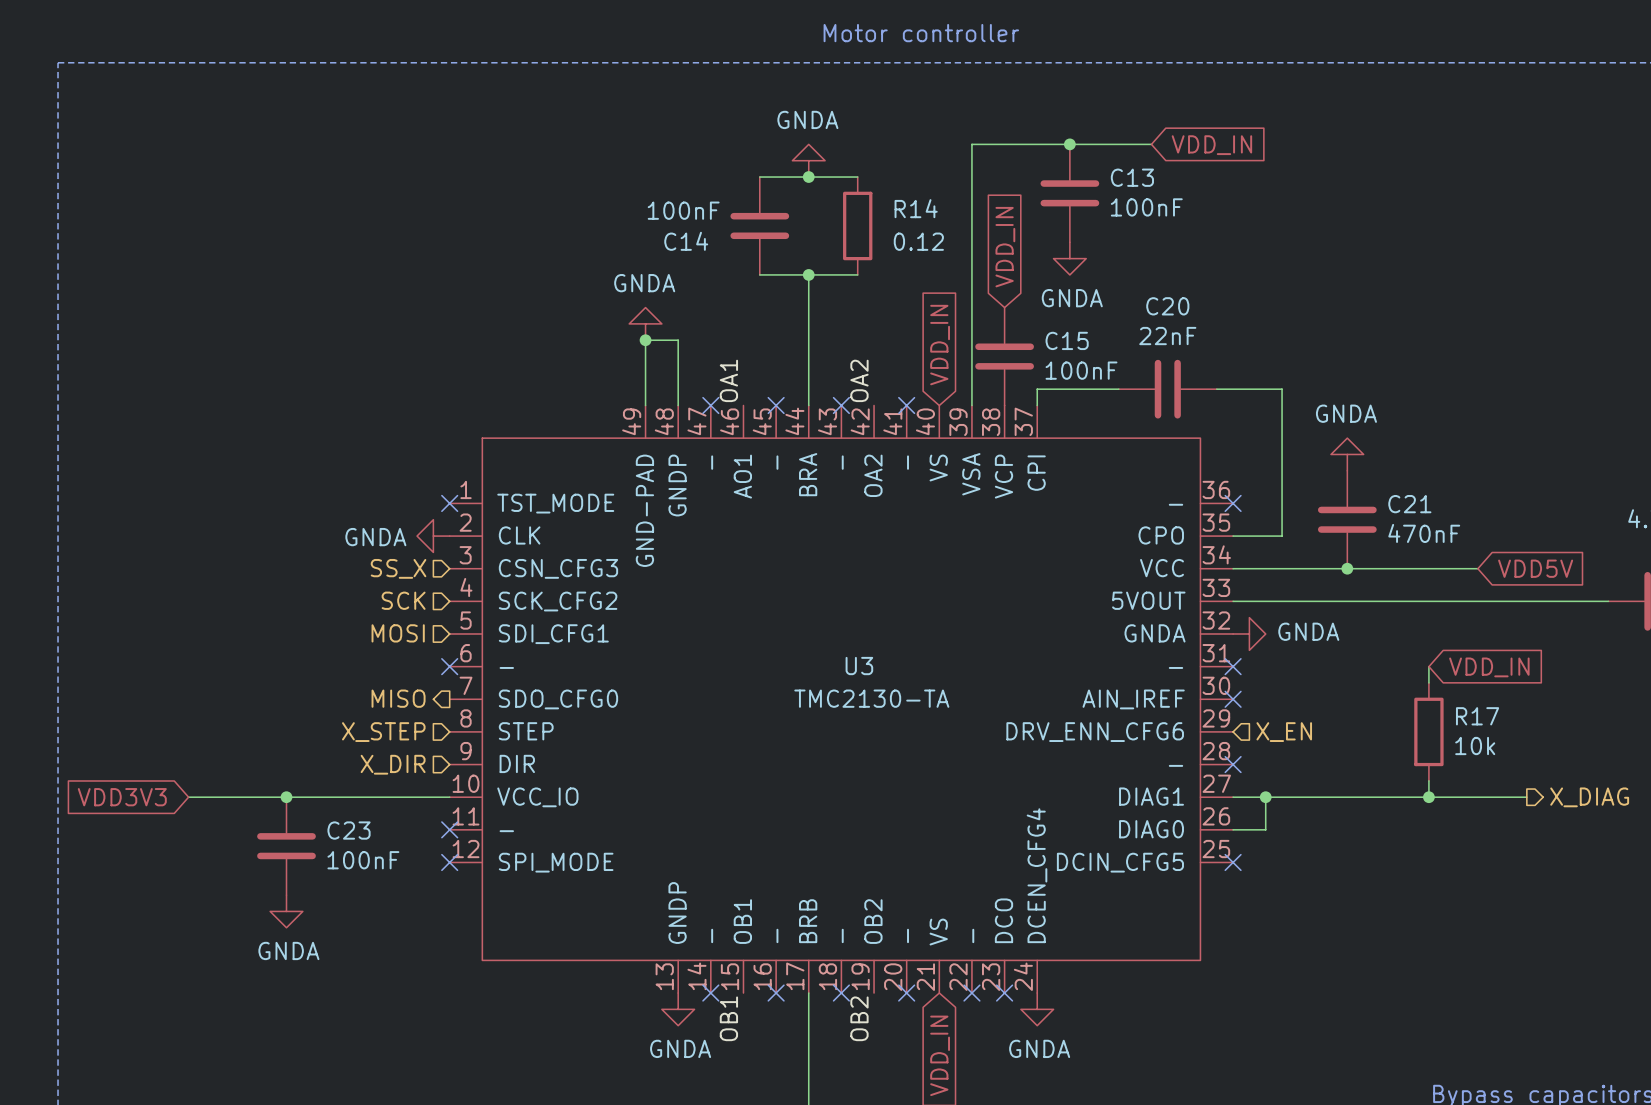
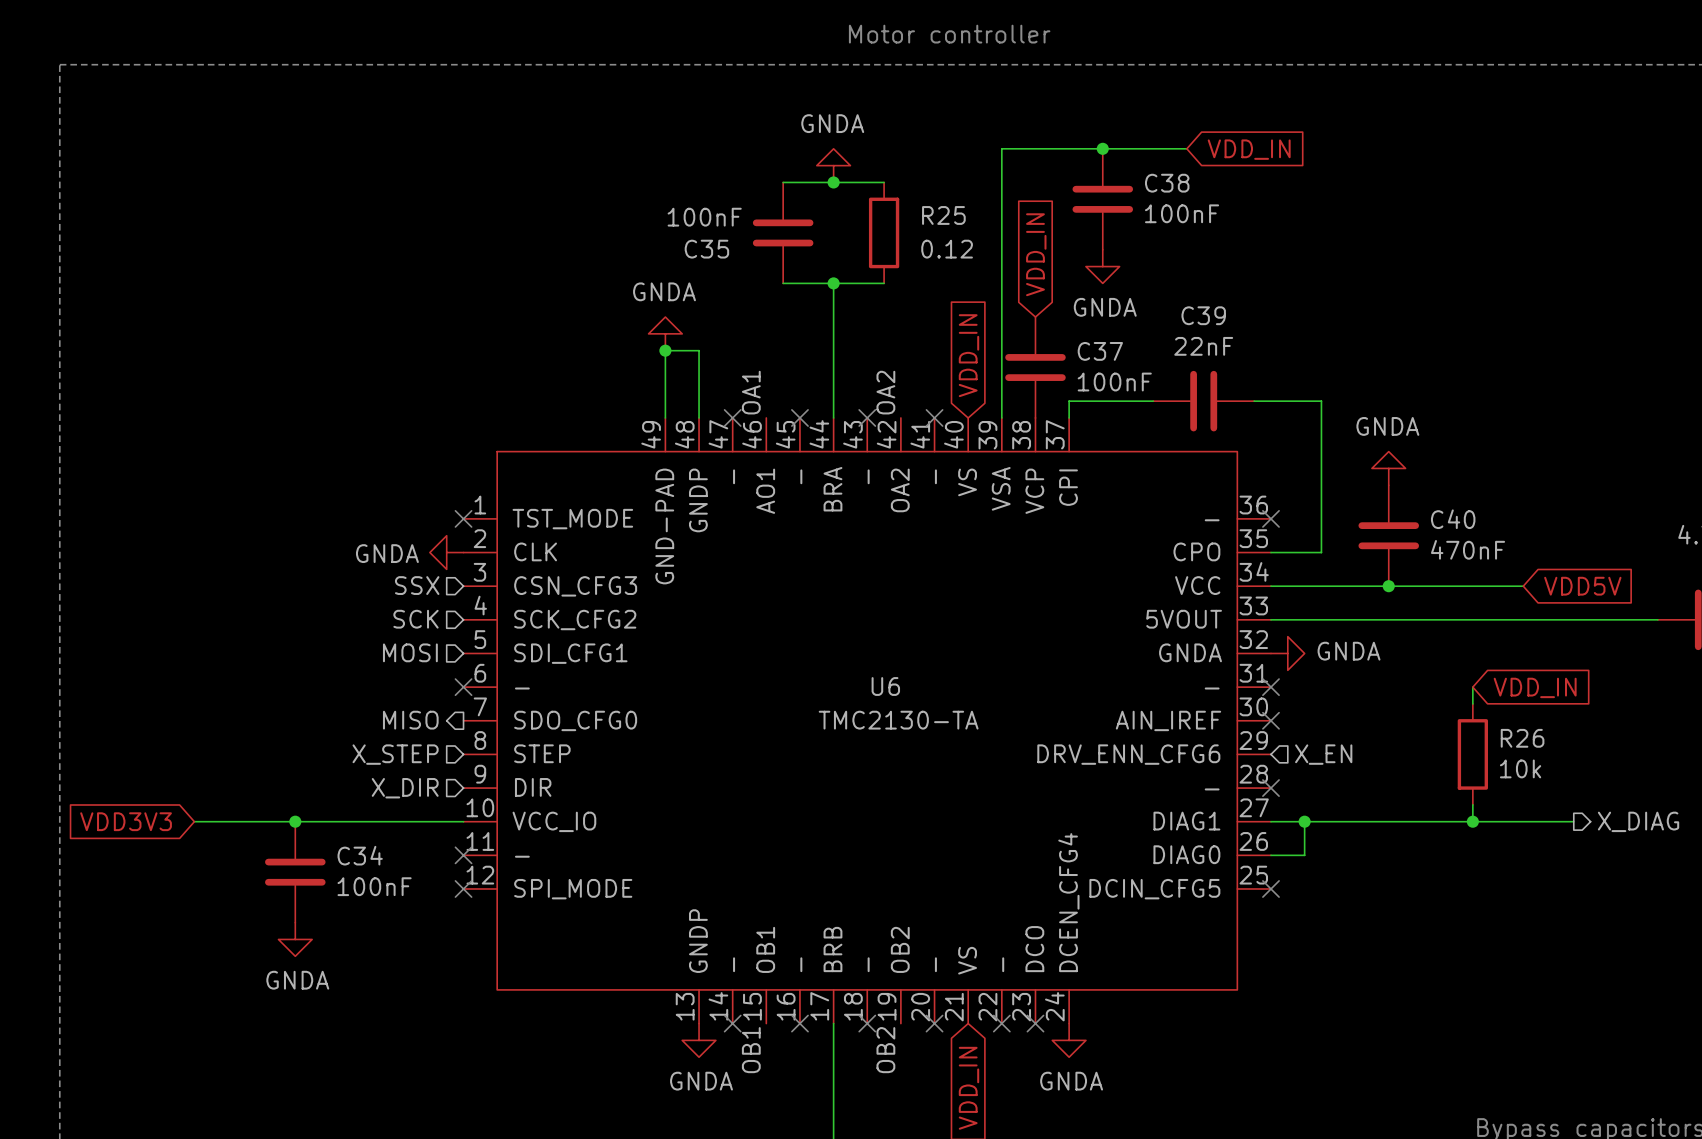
C13 name: C13 (1132, 177) -> C38 (1167, 183)
R14 name: R14 (916, 208) -> R25 (943, 215)
C14 name: C14 (686, 241) -> C35 (706, 249)
C20 name: C20 (1167, 306) -> C39 (1203, 315)
C15 name: C15 (1067, 340) -> C37 (1100, 351)
C21 name: C21 (1409, 504) -> C40 (1453, 519)
hierarchical label: SS_X (398, 568) -> SSX (417, 585)
U3 name: U3 (859, 666) -> U6 (885, 686)
R17 name: R17 (1477, 716) -> R26 (1522, 738)
C23 name: C23 (349, 830) -> C34 (360, 855)

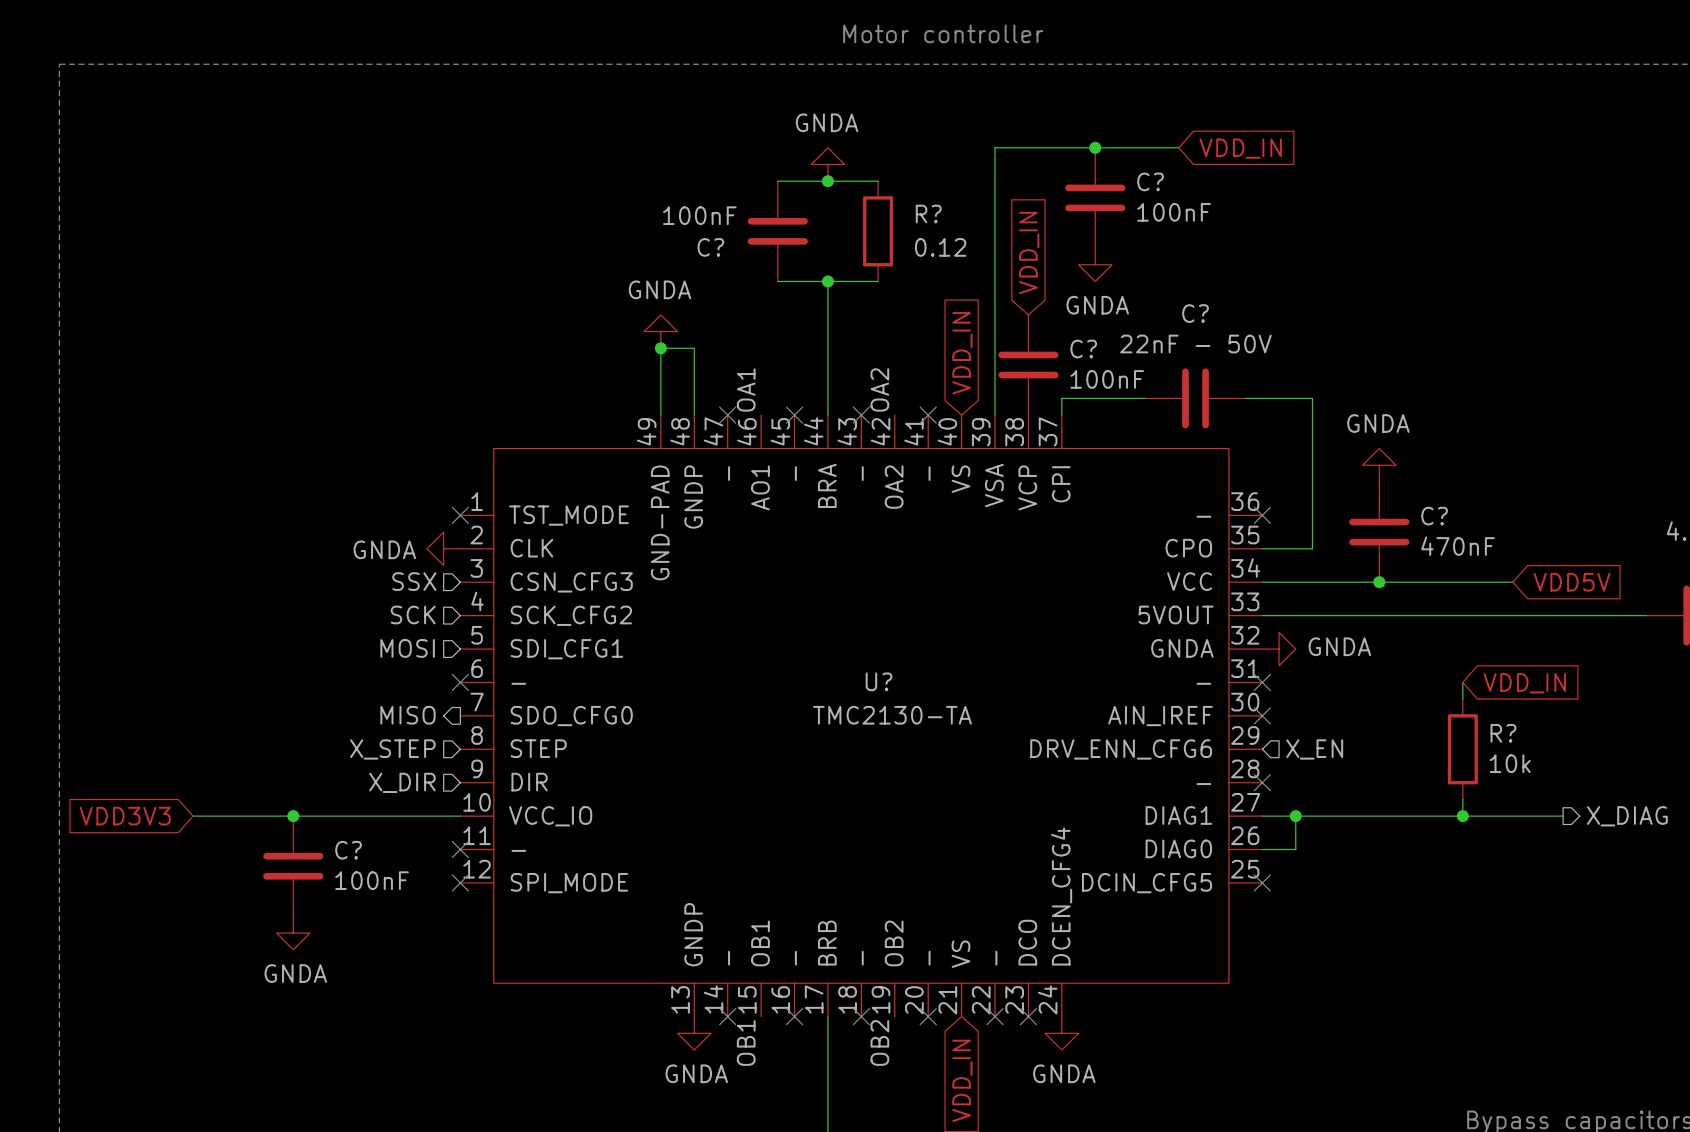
C38 name: C38 (1167, 183) -> C? (1150, 181)
R25 name: R25 (943, 215) -> R? (928, 214)
C35 name: C35 (706, 249) -> C? (710, 247)
C39 name: C39 (1203, 315) -> C? (1195, 313)
C39 value: 22nF (1203, 346) -> 22nF - 50V (1195, 344)
C37 name: C37 (1100, 351) -> C? (1083, 349)
C40 name: C40 (1453, 519) -> C? (1434, 516)
U6 name: U6 (885, 686) -> U? (878, 681)
R26 name: R26 (1522, 738) -> R? (1503, 733)
C34 name: C34 (360, 855) -> C? (348, 850)

